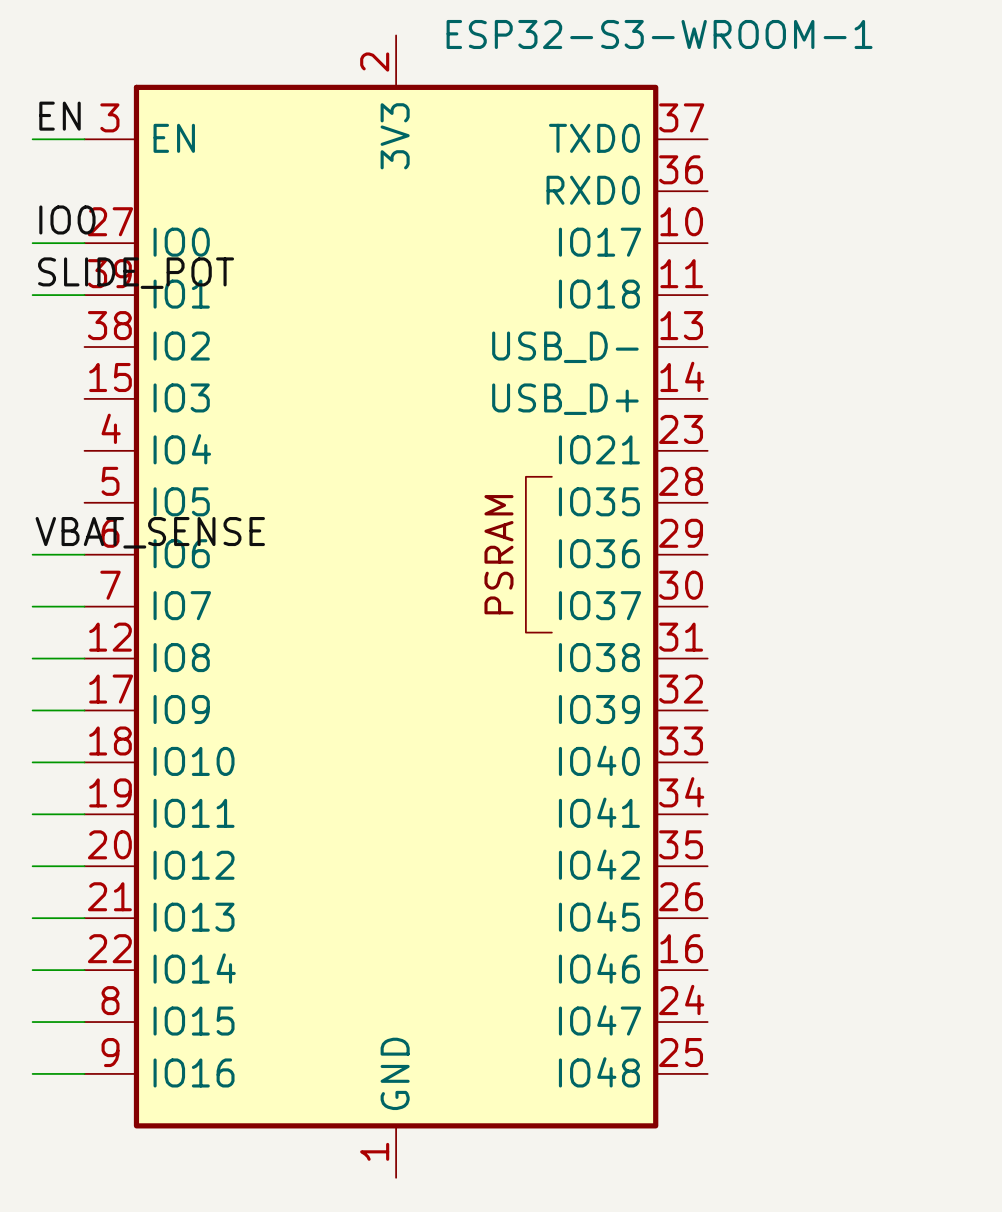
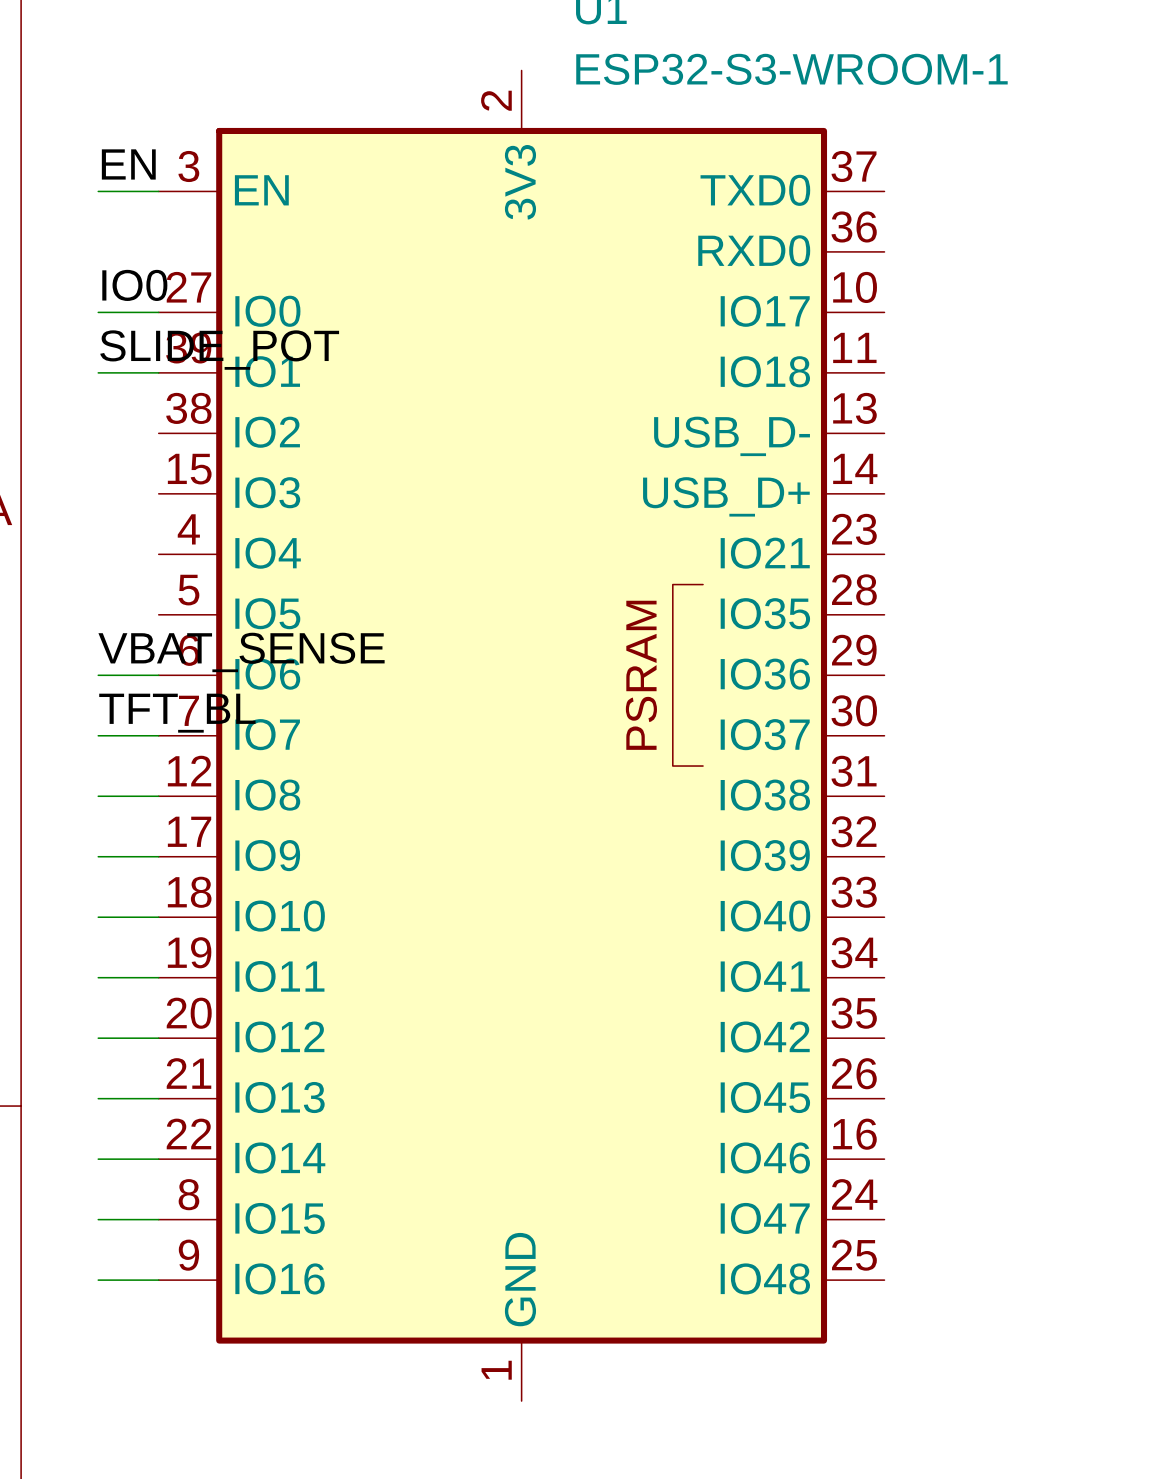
label: none -> TFT_BL (177, 713)

